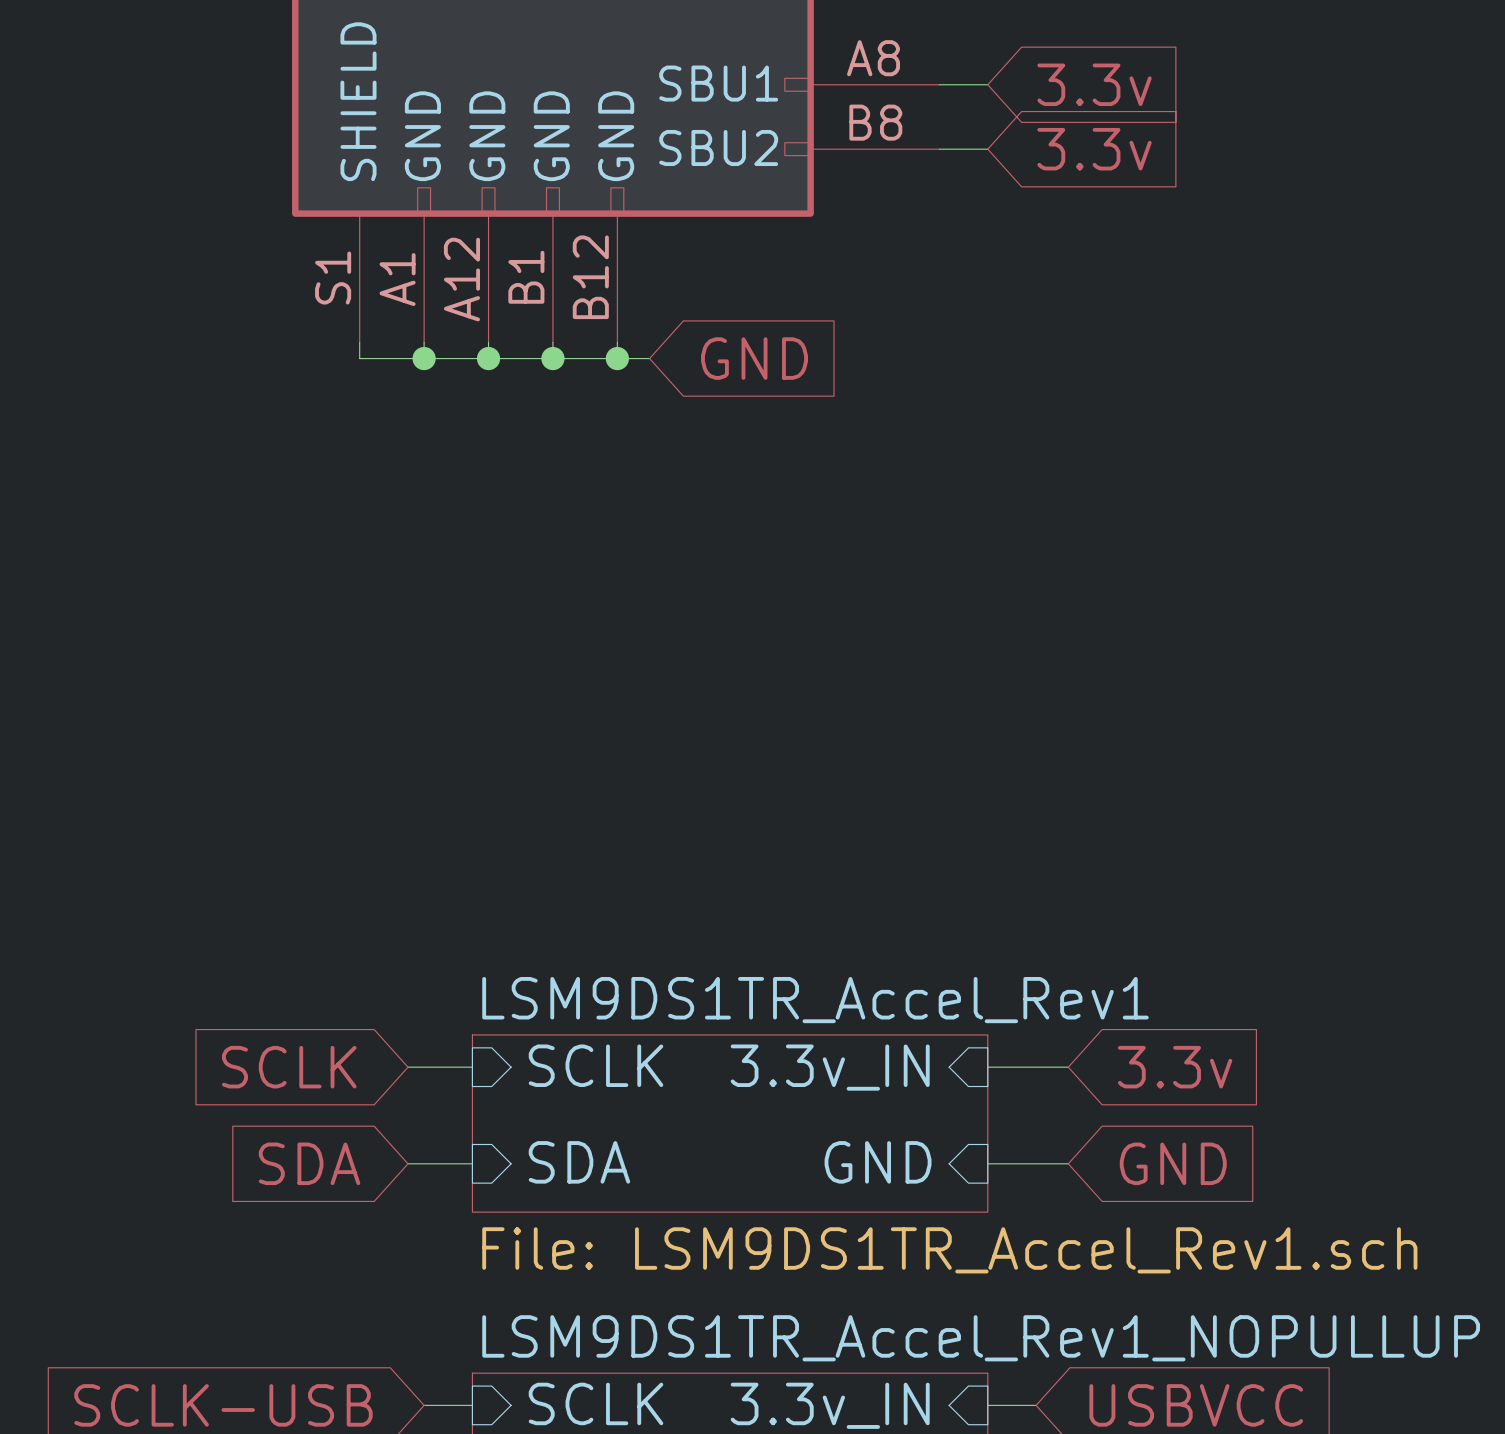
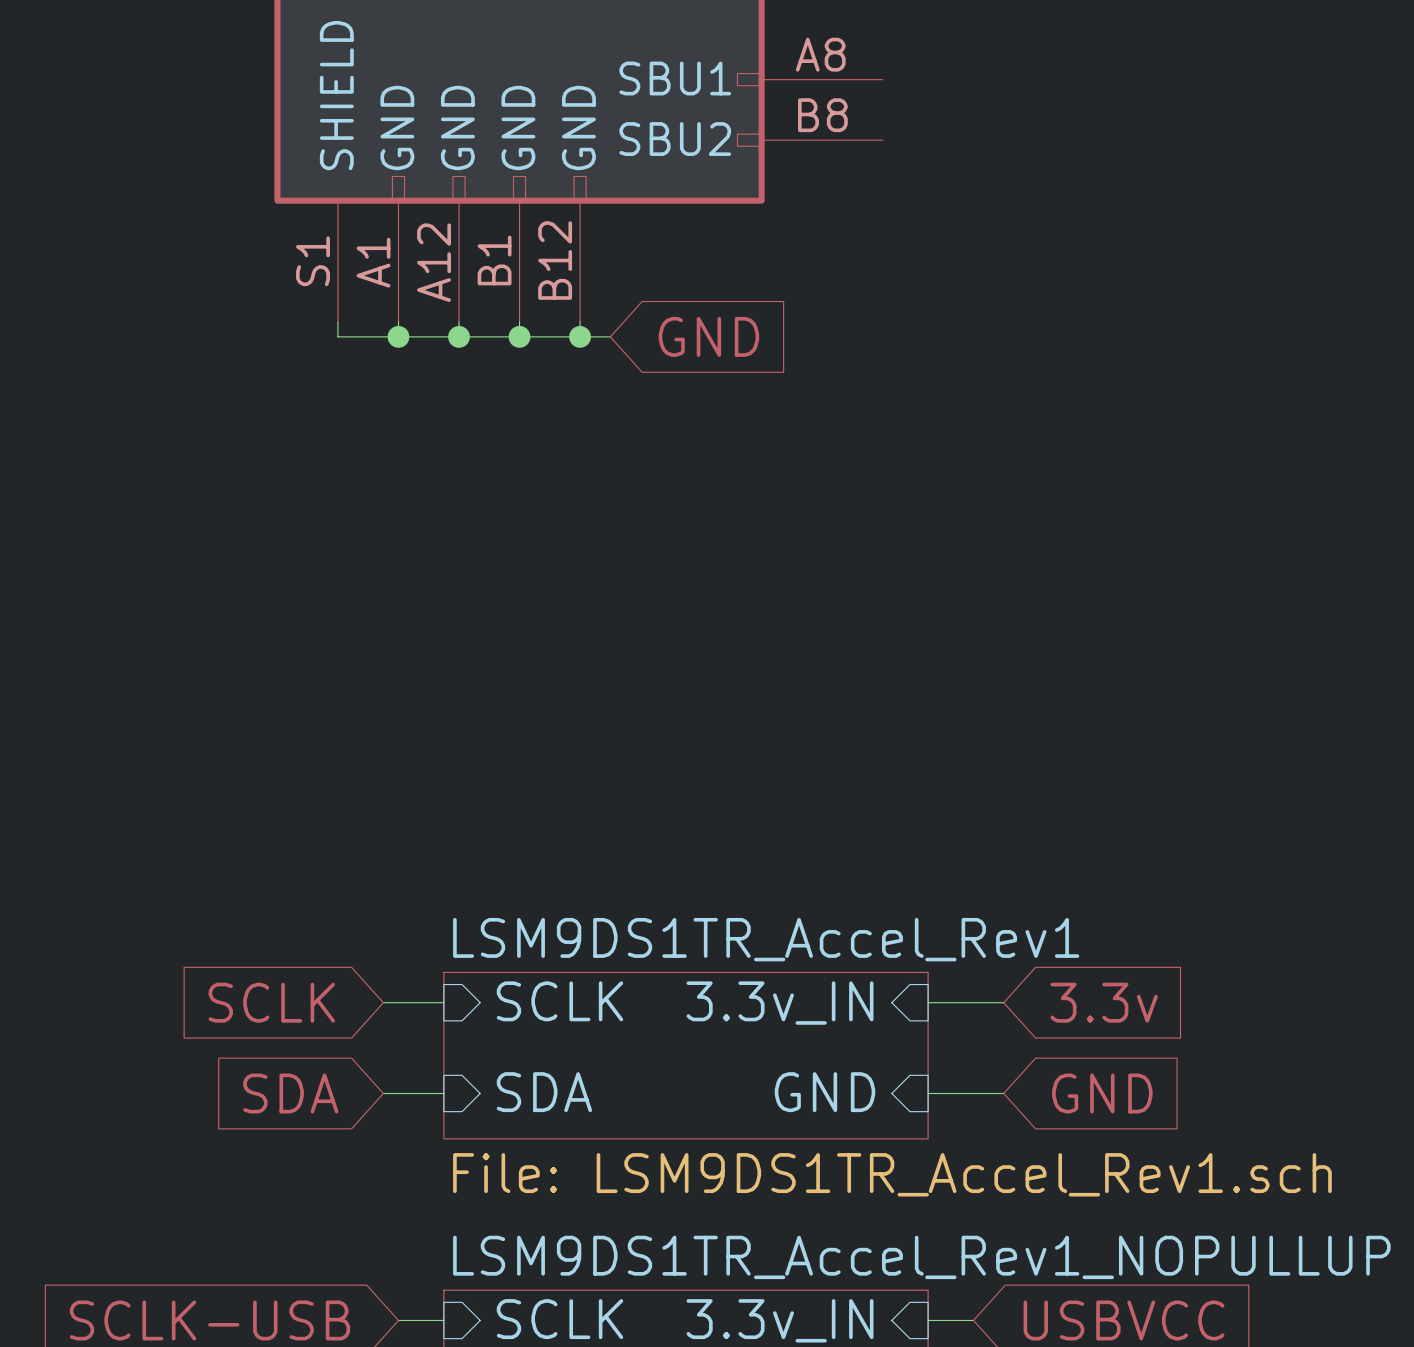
wire: (939, 84) (987, 84) -> none
global label: 3.3v (1094, 84) -> none
wire: (939, 149) (987, 149) -> none
global label: 3.3v (1094, 149) -> none

